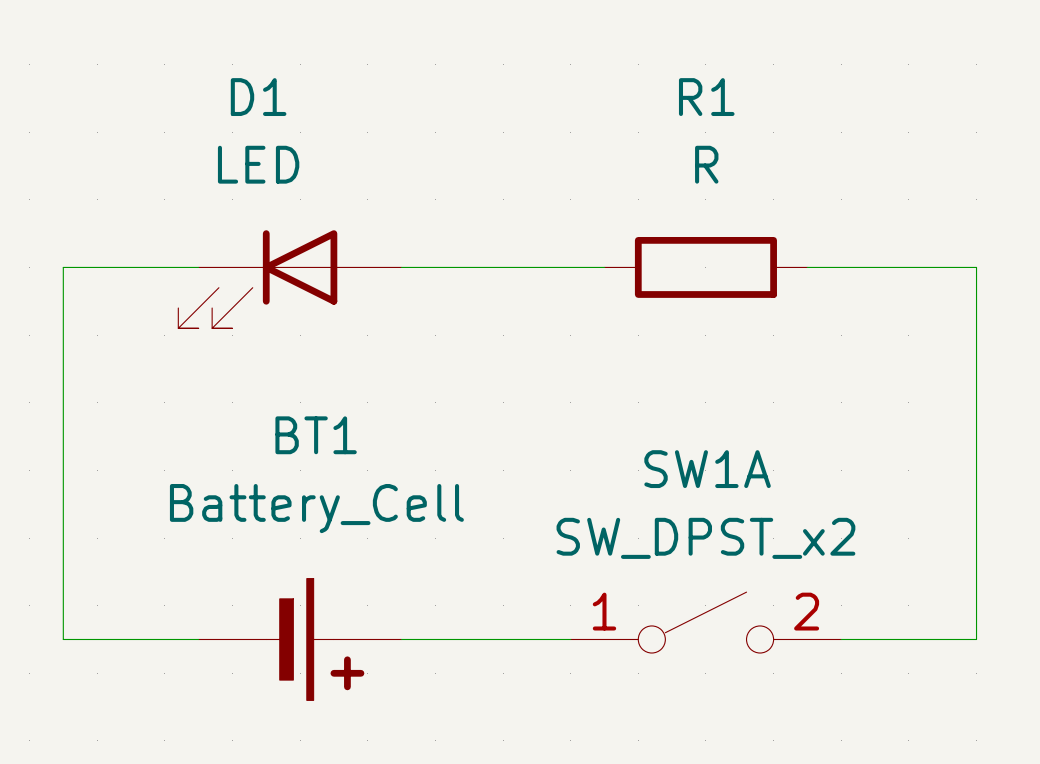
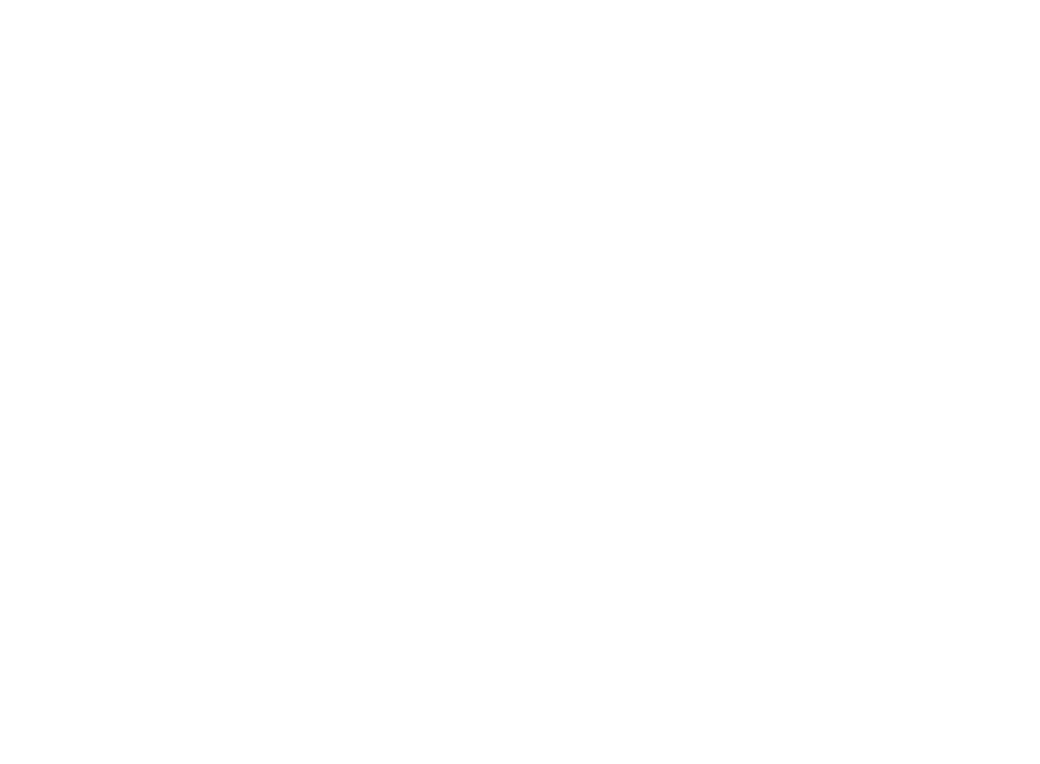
wire: (198, 267) (63, 267) (63, 639) (198, 639) -> none
wire: (401, 267) (604, 267) -> none
R1: R (705, 267) -> none
wire: (807, 267) (976, 267) (976, 639) (841, 639) -> none
D1: LED (289, 279) -> none
SW1A: SW_DPST_x2 (705, 622) -> none
BT1: Battery_Cell (300, 639) -> none
wire: (401, 639) (570, 639) -> none

